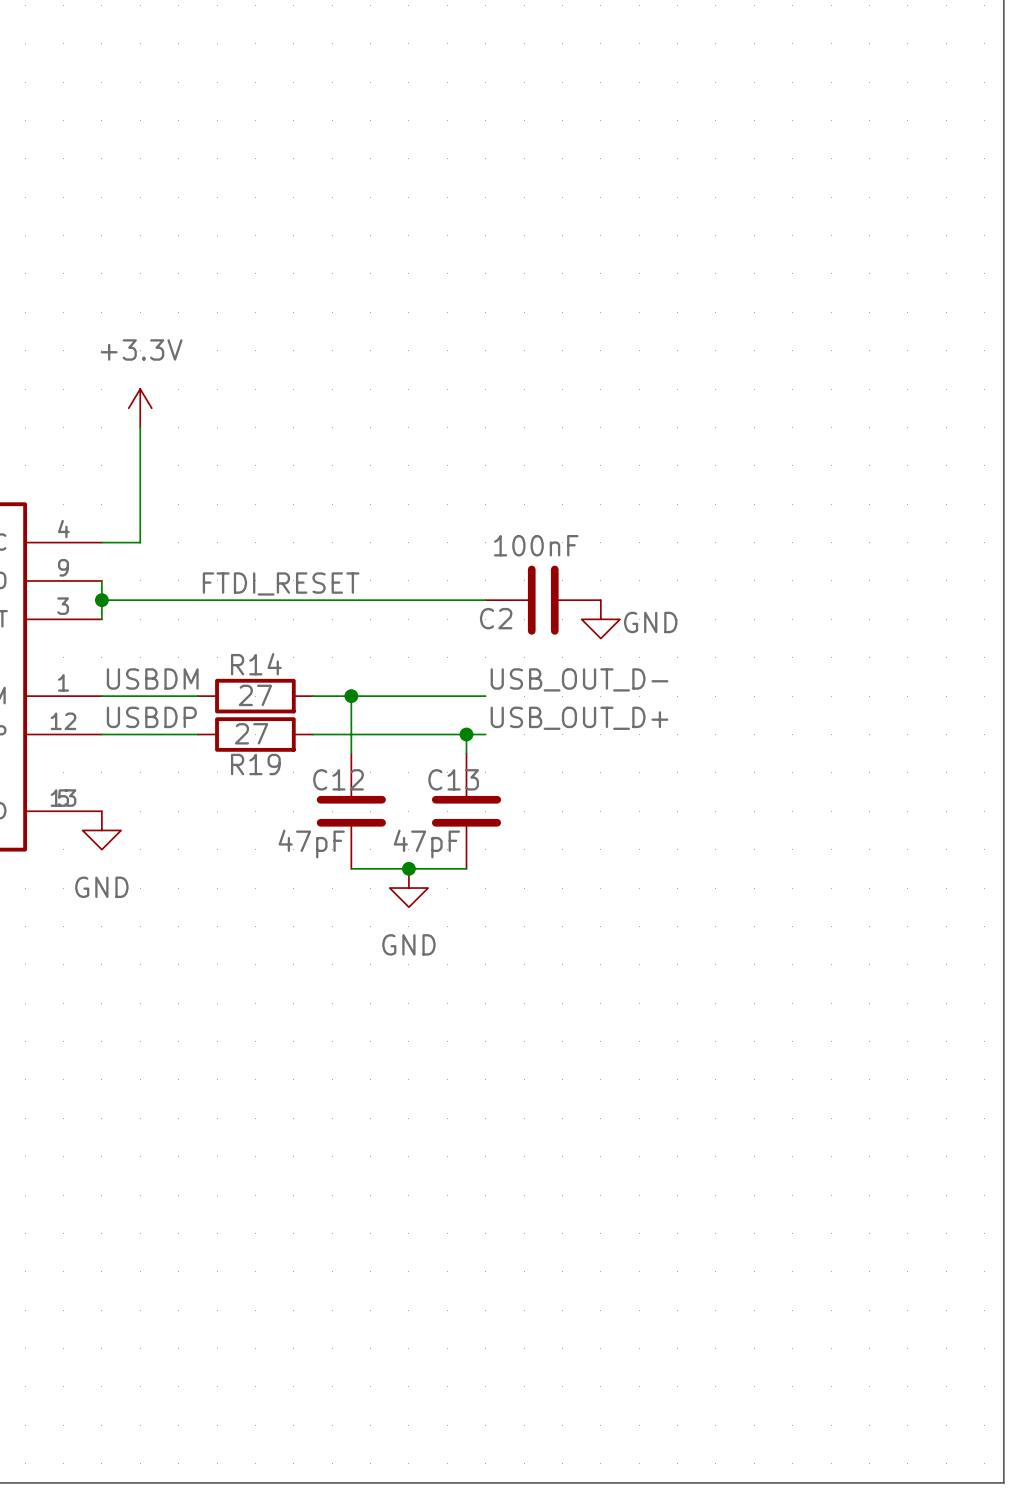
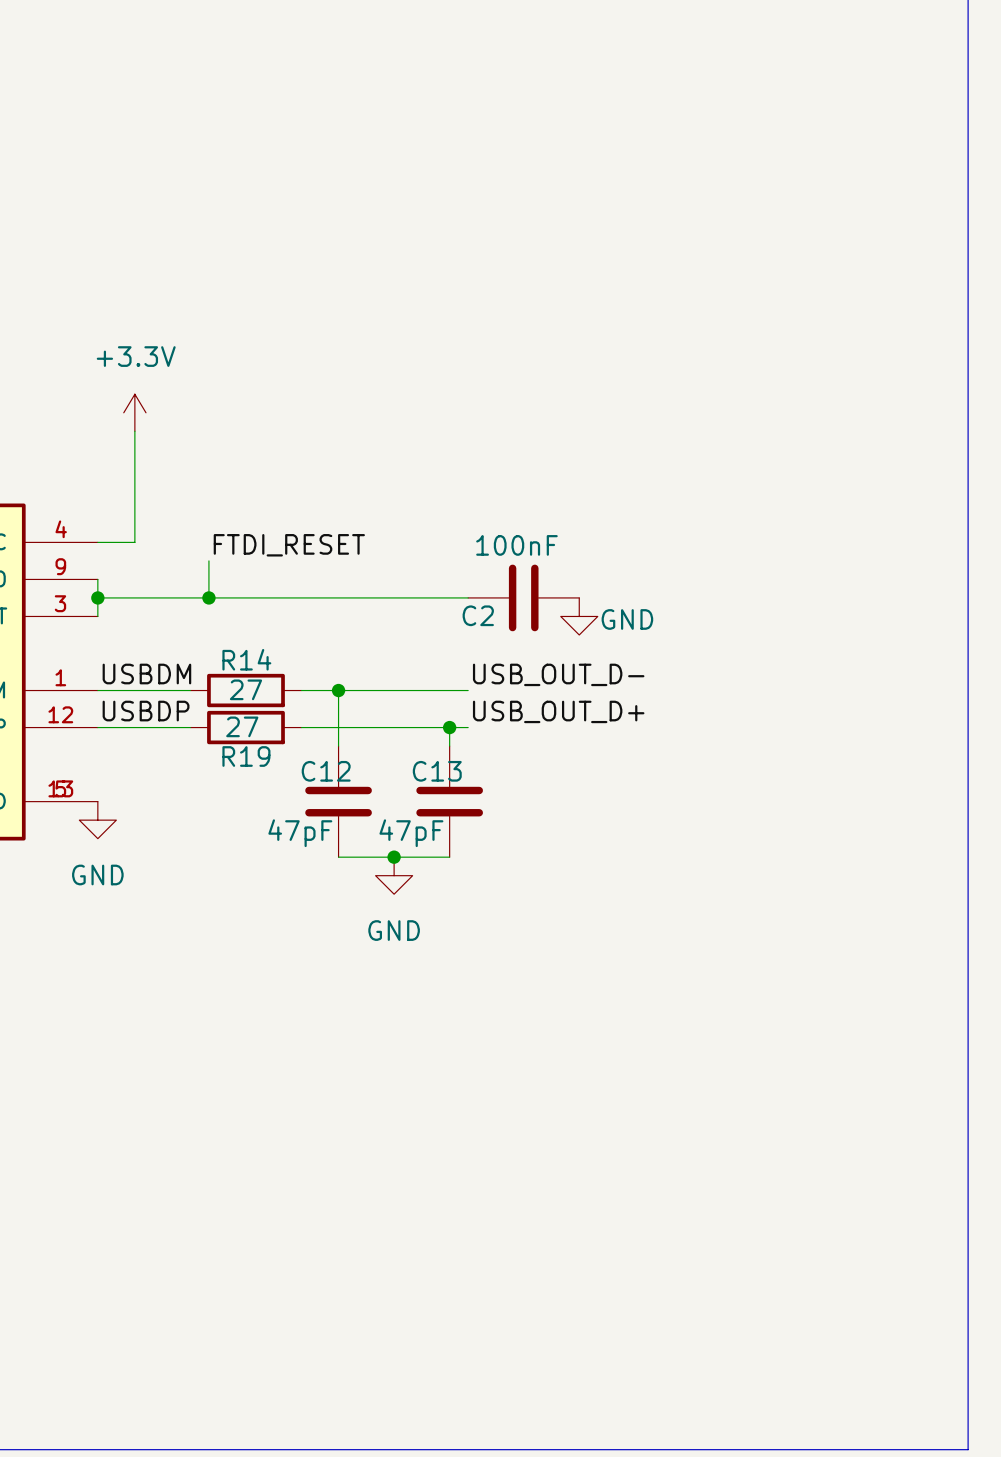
wire: none -> (208, 560) (208, 597)
label position: FTDI_RESET (281, 583) -> FTDI_RESET (289, 545)
junction: none -> (208, 597)

